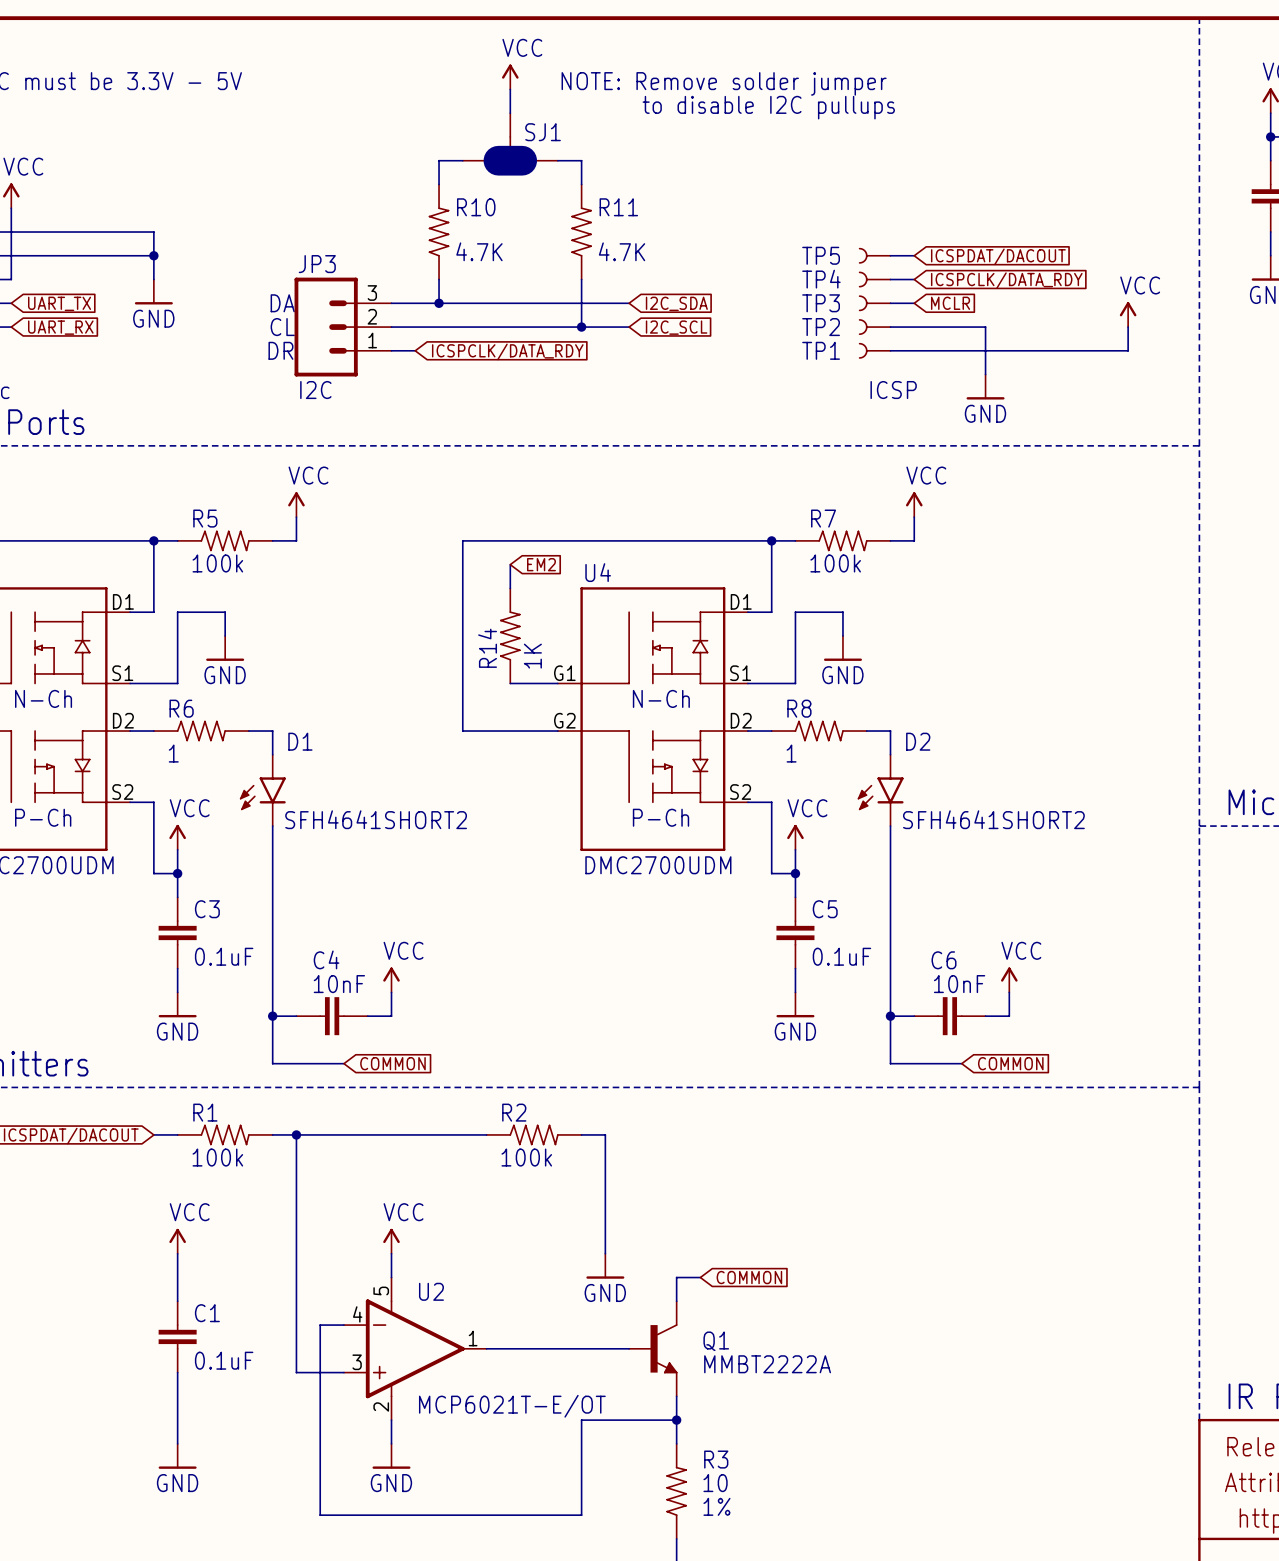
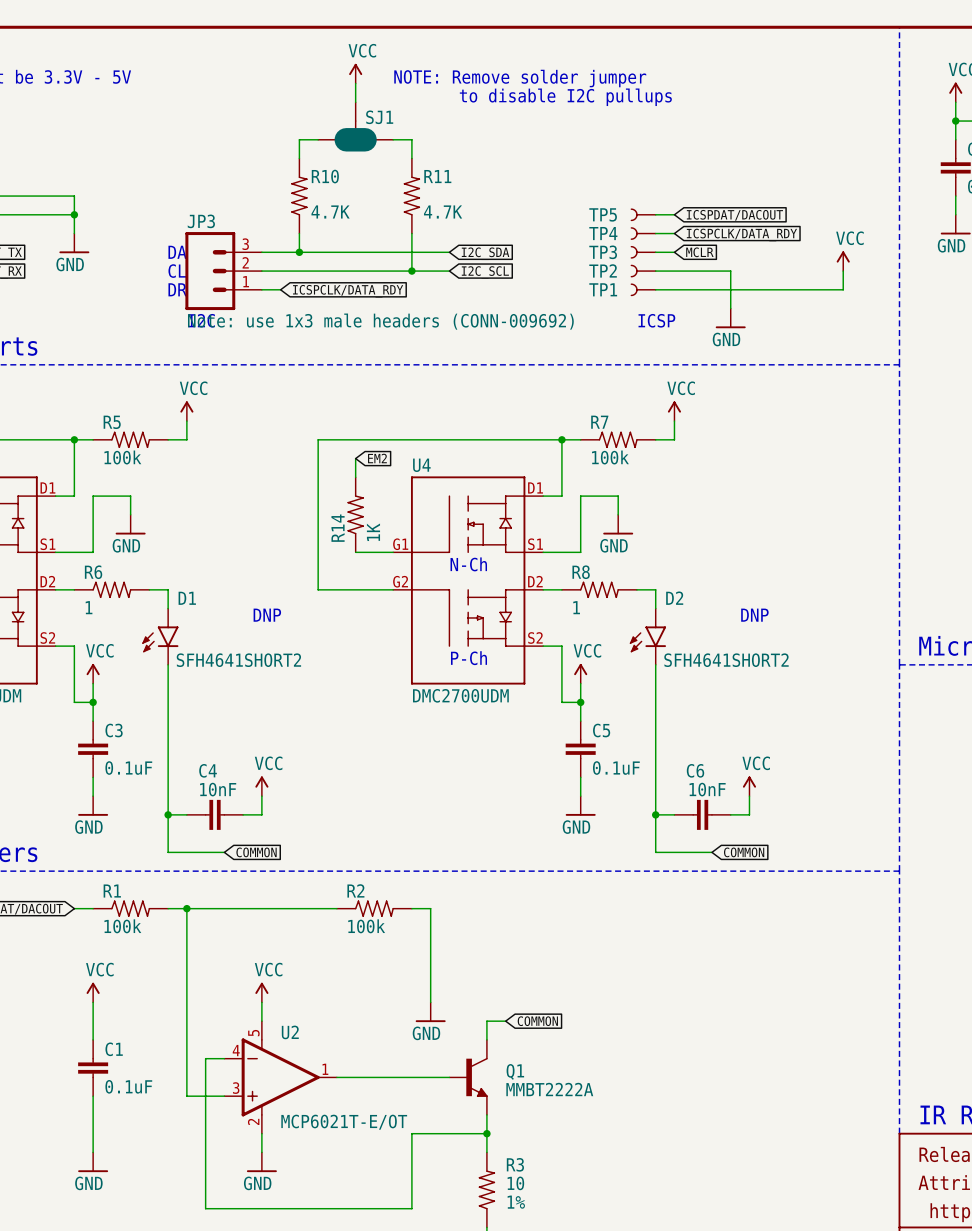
JP3 value: none -> Note: use 1x3 male headers (CONN-009692) (380, 321)
text: none -> DNP (267, 615)
text: none -> DNP (754, 615)

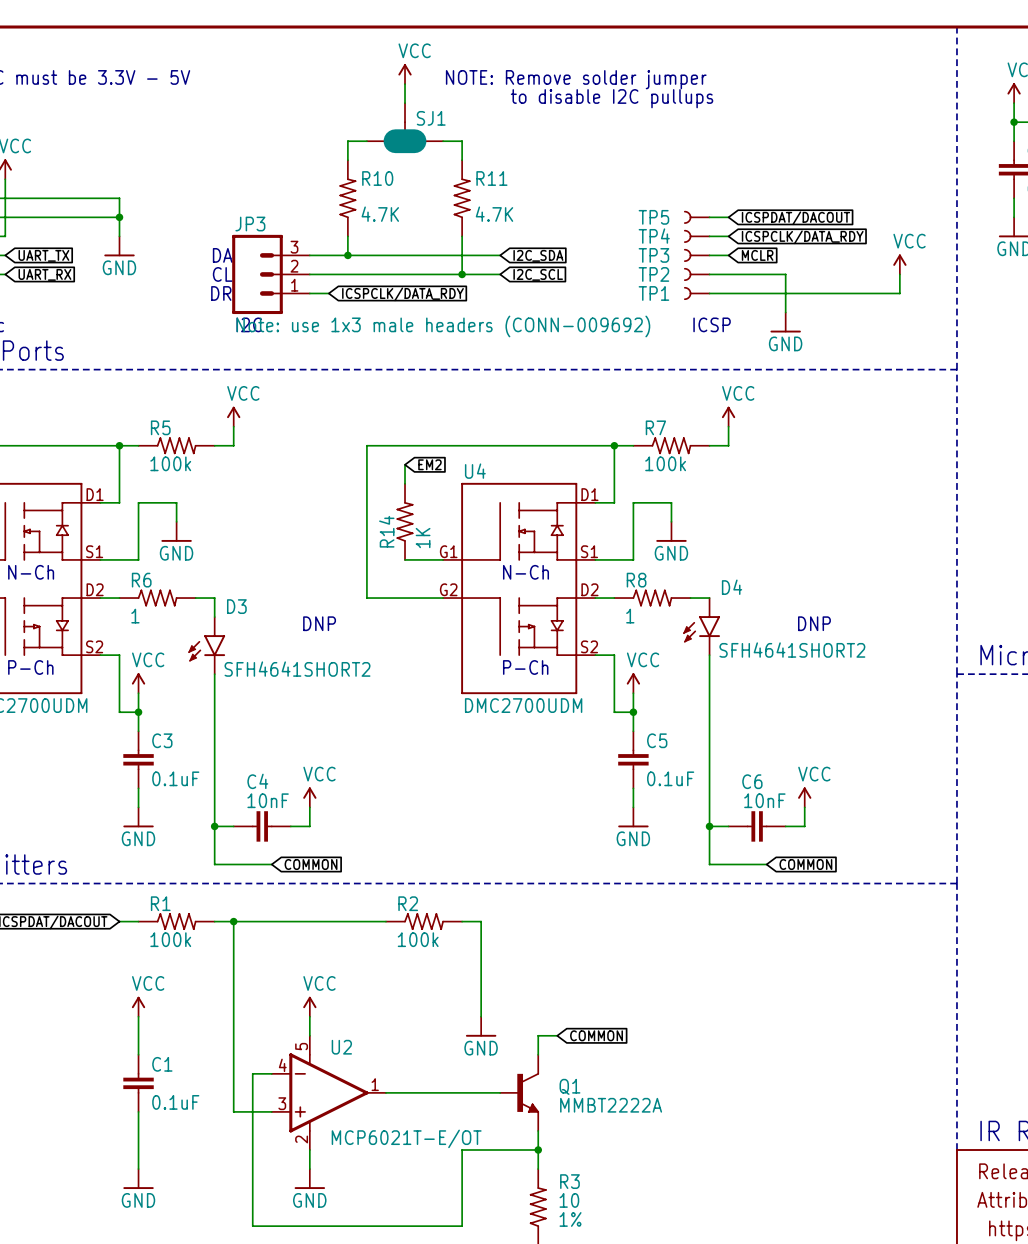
D1 name: D1 (187, 598) -> D3 (236, 606)
D4: none -> SFH4641SHORT2 (701, 626)
D2: SFH4641SHORT2 (647, 636) -> none

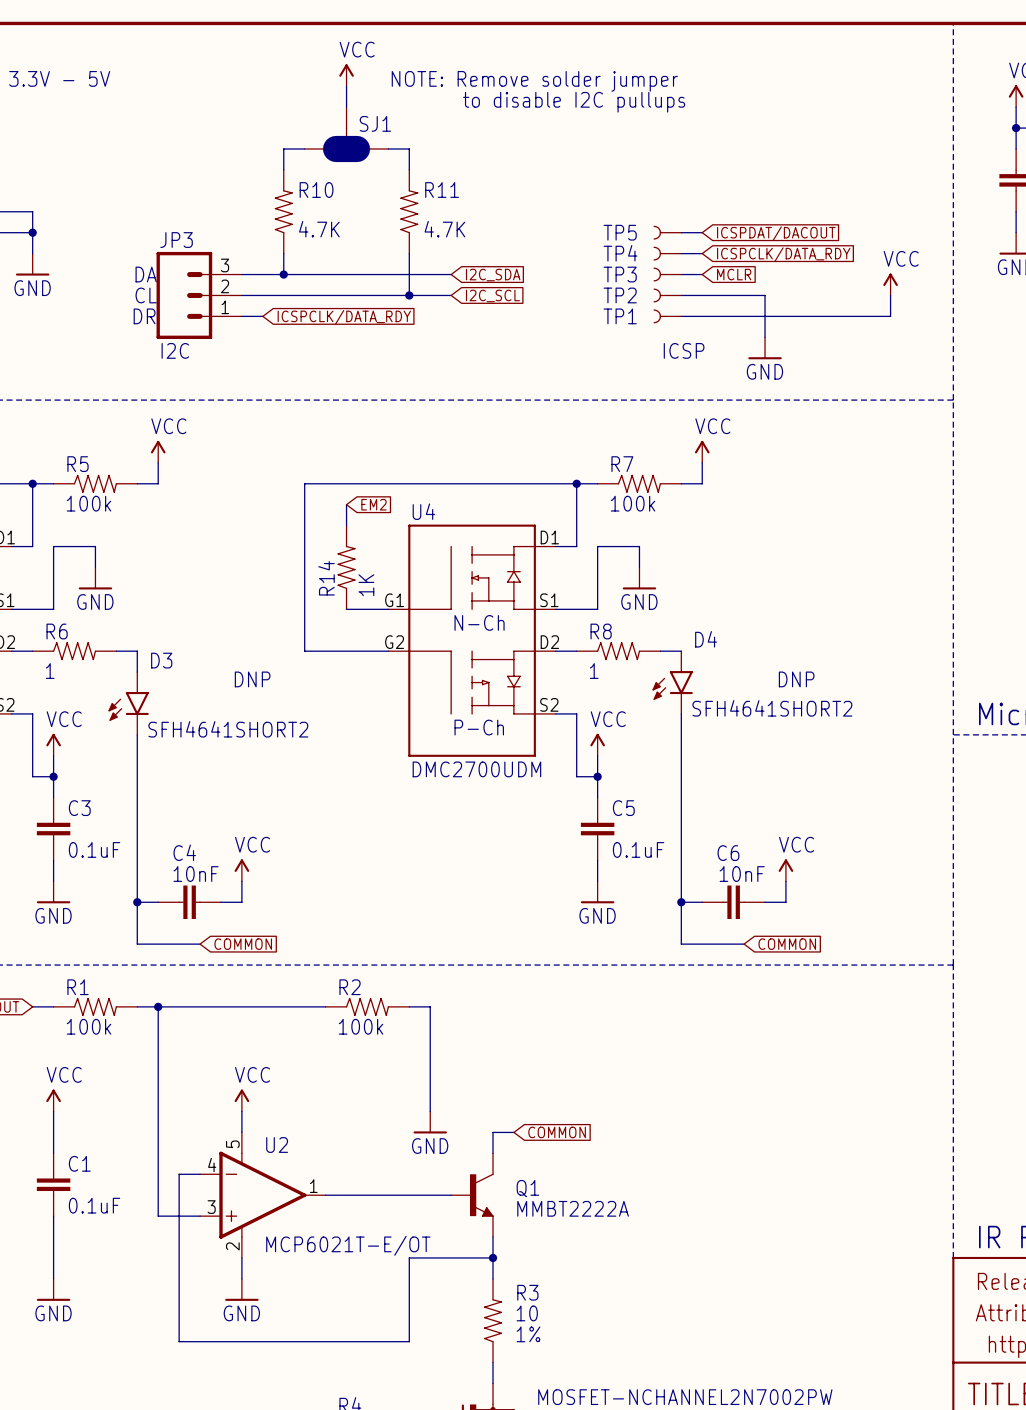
JP3 value: Note: use 1x3 male headers (CONN-009692) (443, 326) -> none

